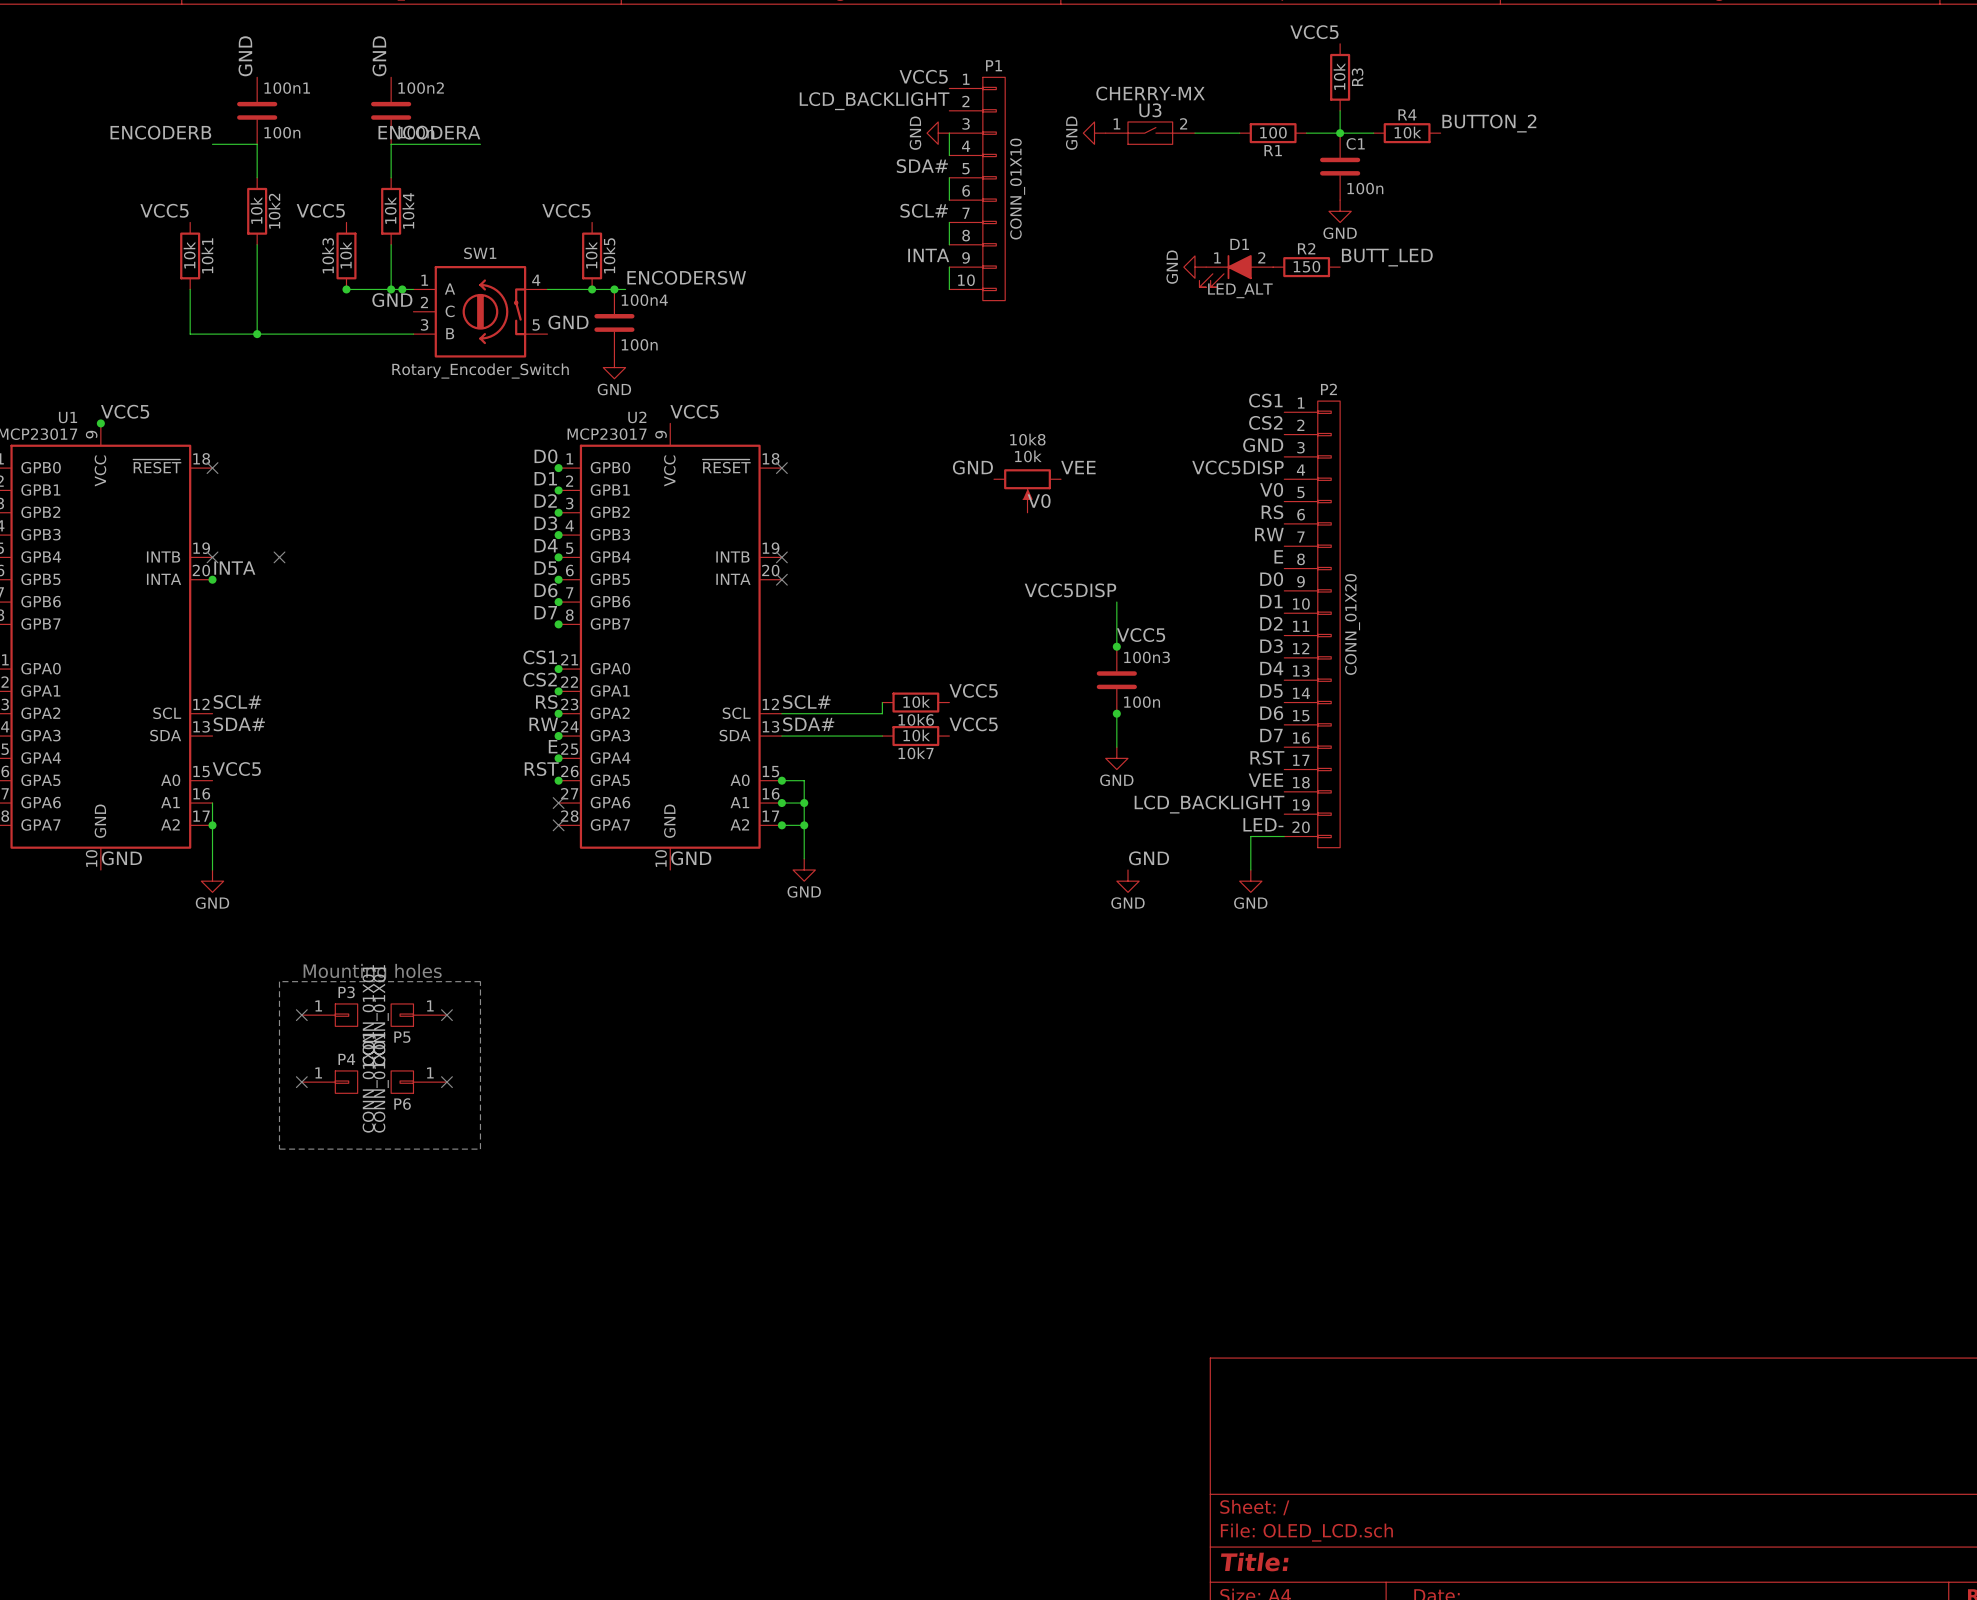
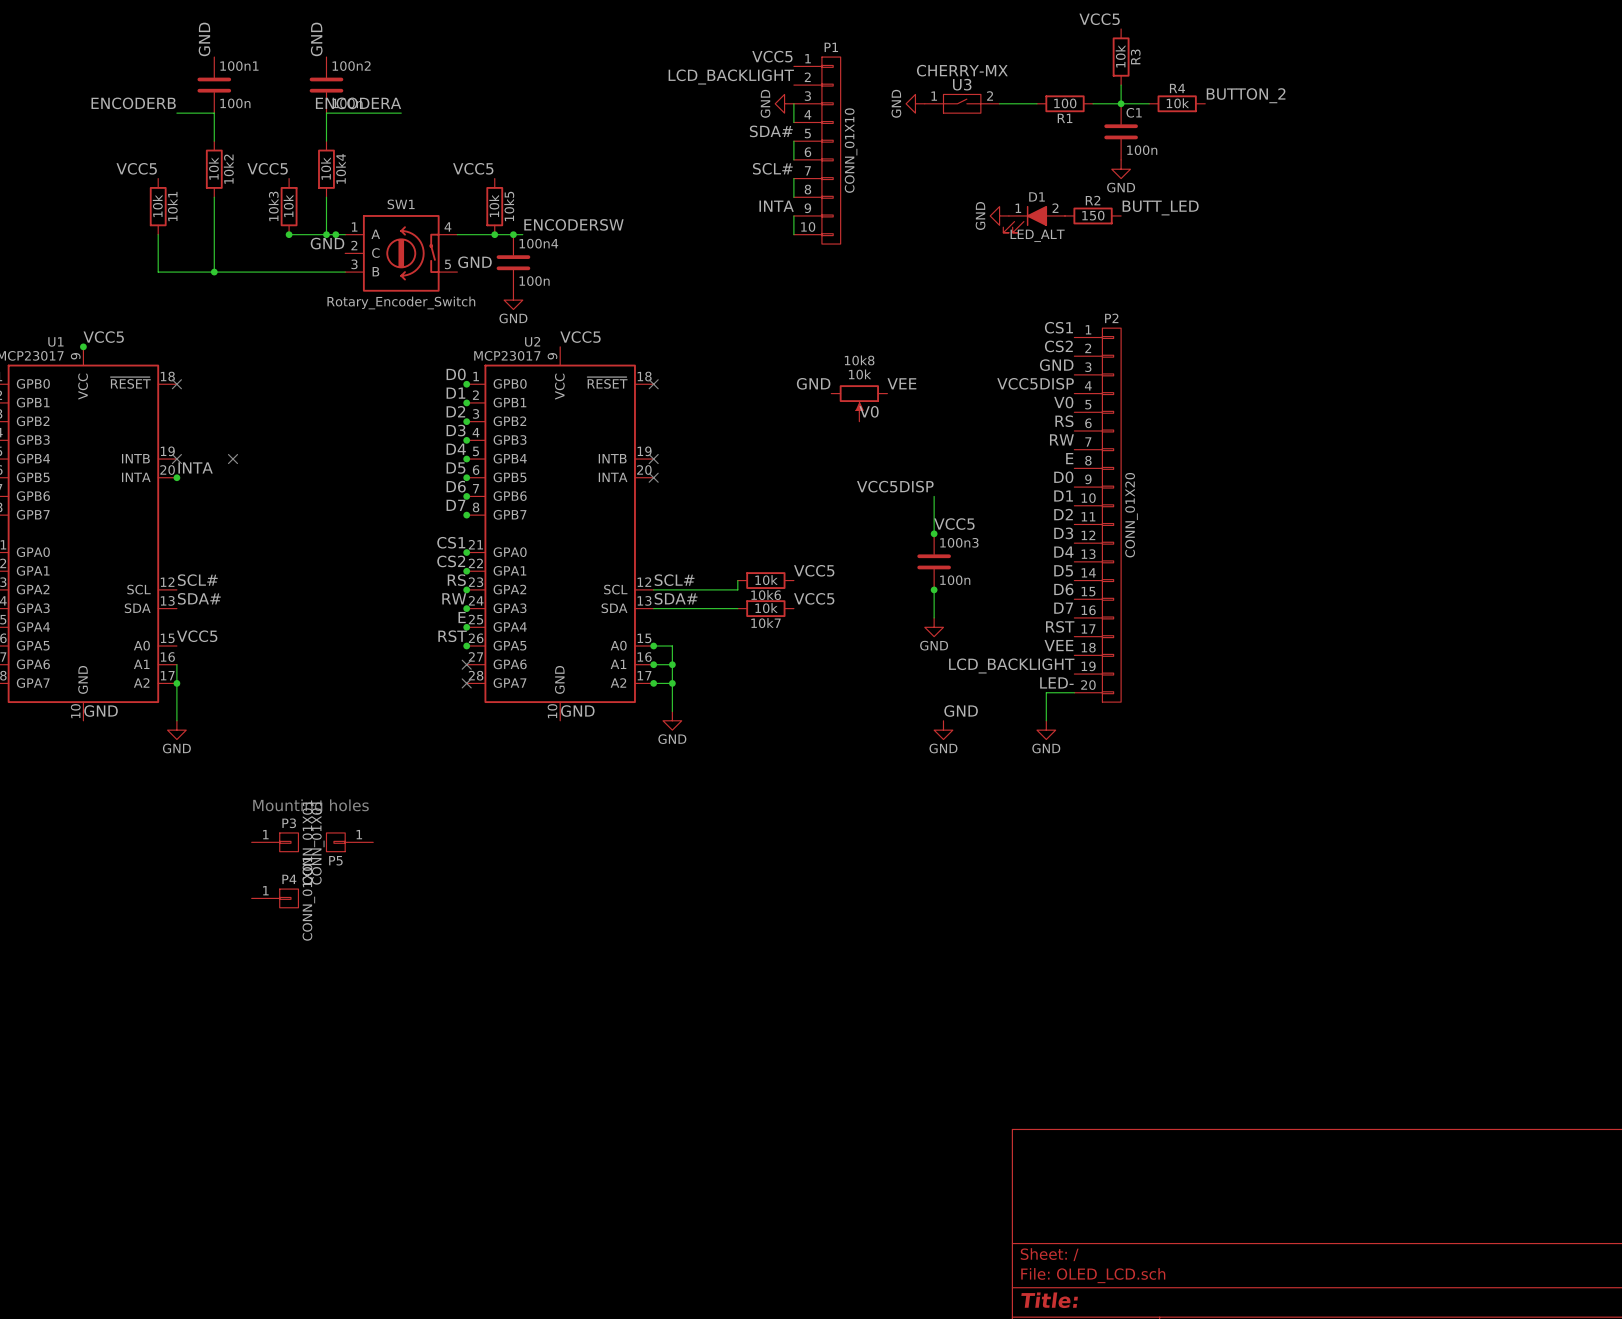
line: (279, 981) (480, 981) (480, 1149) (279, 1149) (279, 981) -> none
no-connect mark: (301, 1015) -> none
no-connect mark: (446, 1015) -> none
no-connect mark: (301, 1082) -> none
P6: CONN_01X01 (419, 1082) -> none
no-connect mark: (446, 1082) -> none

